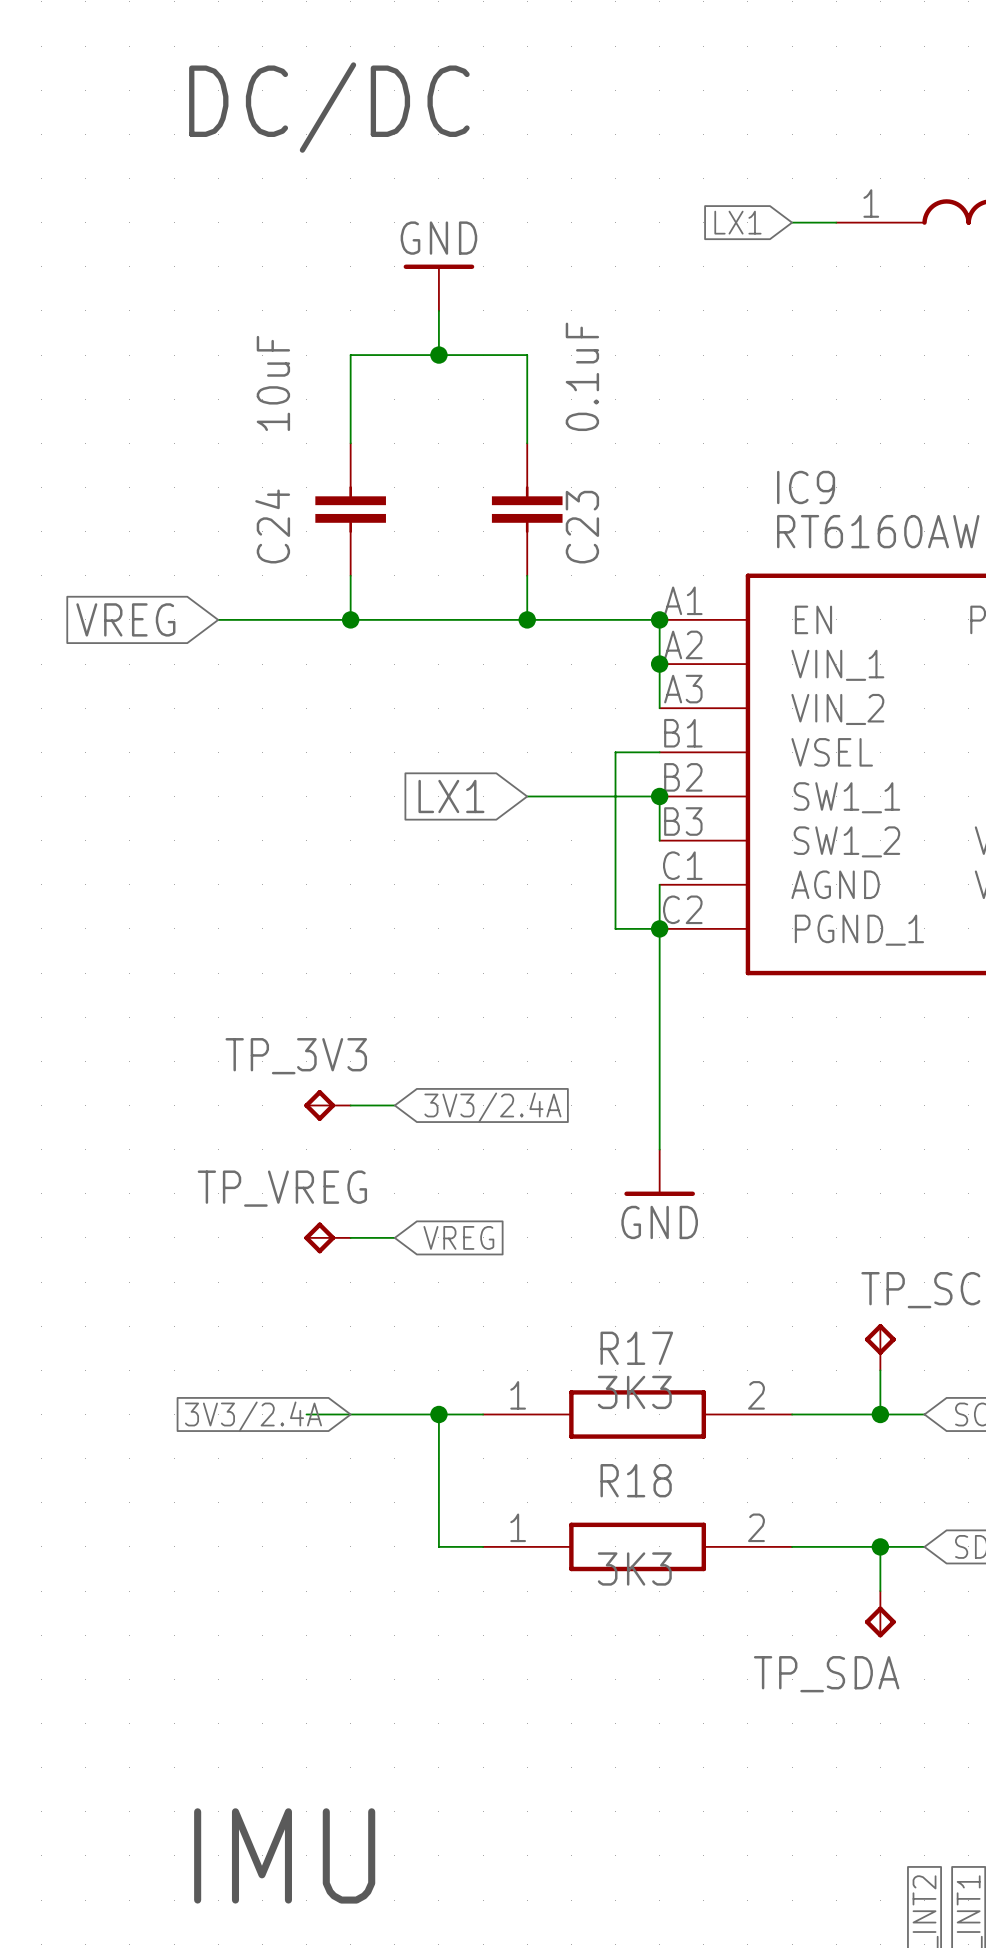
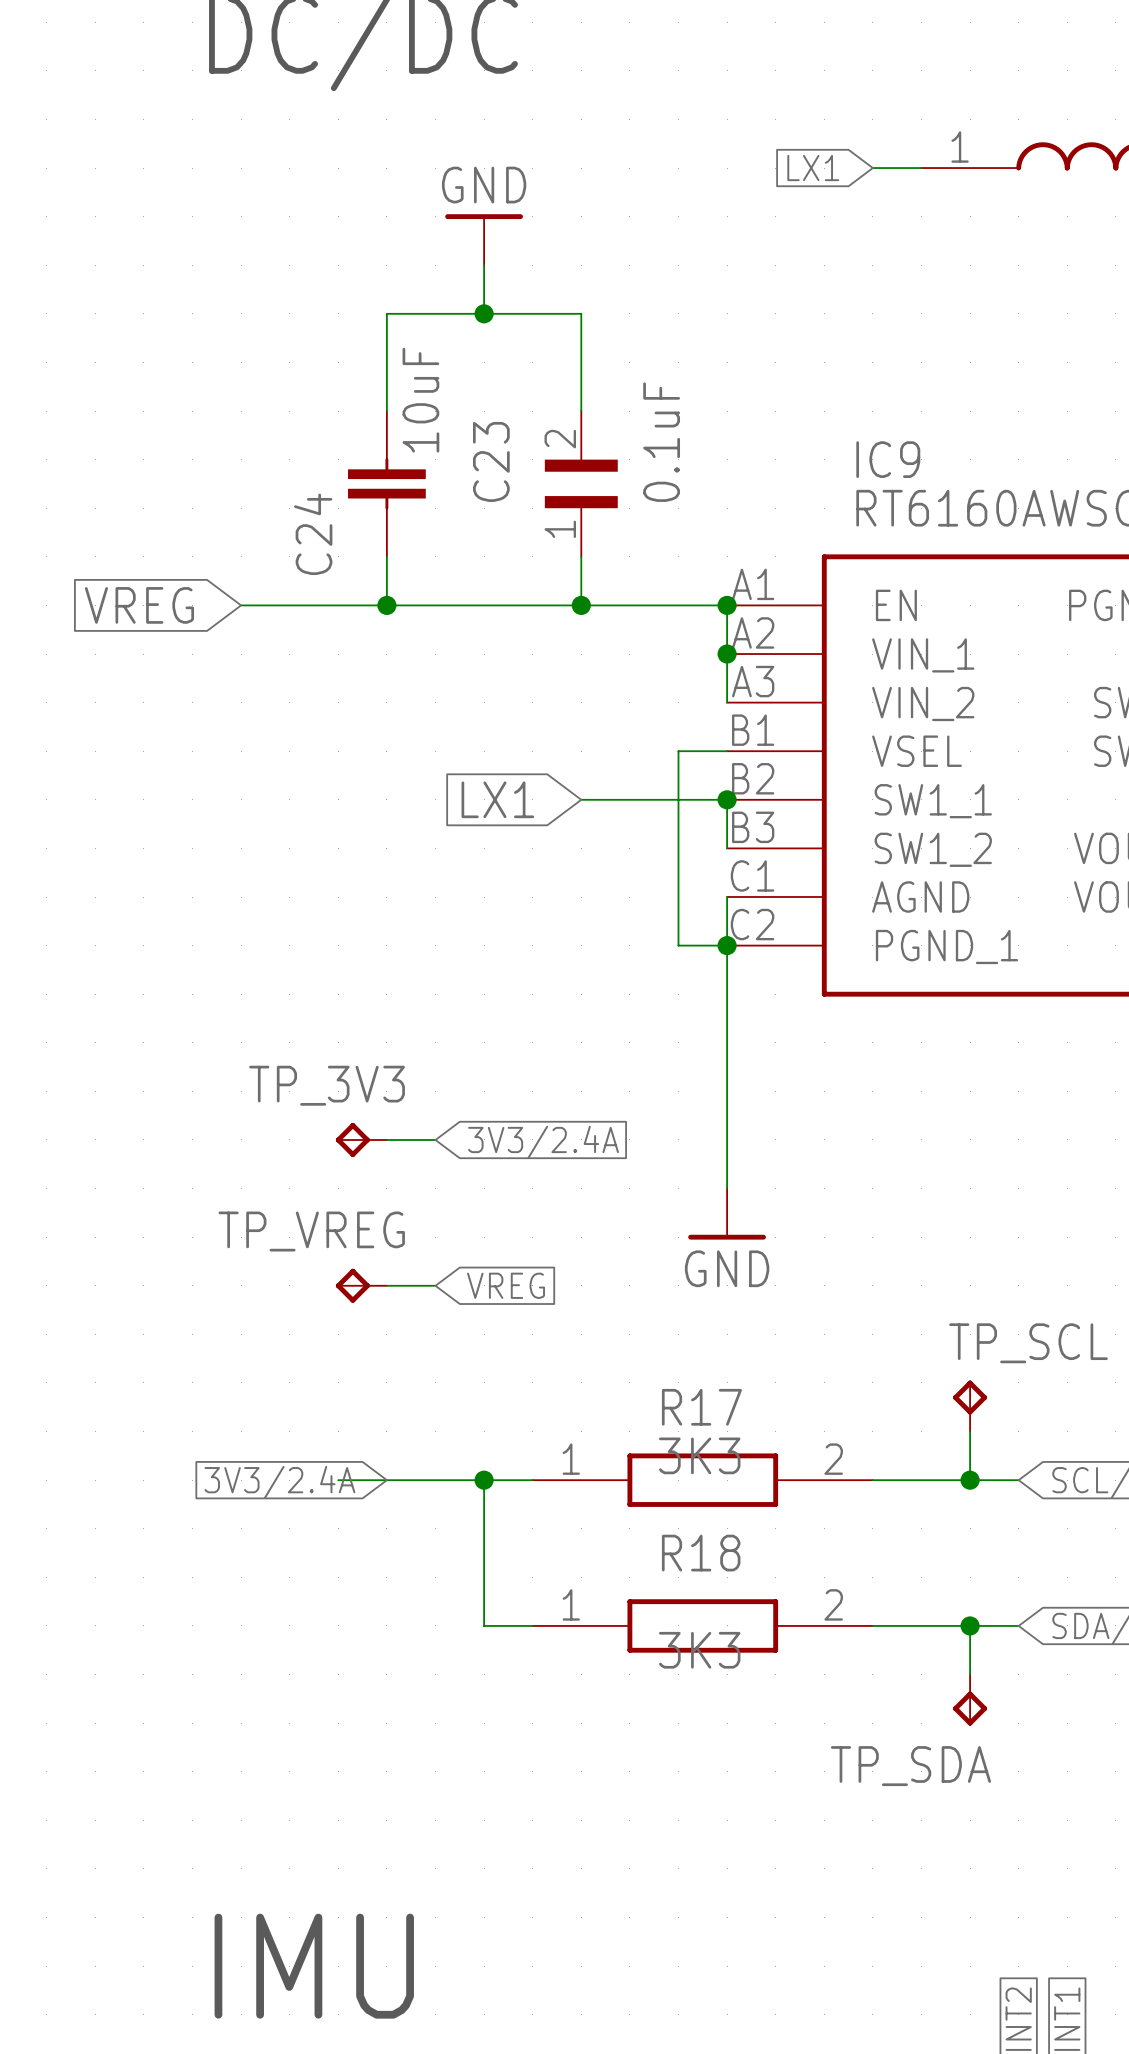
C23 value position: 0.1uF (582, 376) -> 0.1uF (661, 442)
C24 value position: 10uF (273, 383) -> 10uF (420, 400)
C23 symbol: [491, 443, 563, 576] -> [544, 411, 618, 557]
C24 name position: C24 (272, 526) -> C24 (313, 534)
C23 name position: C23 (582, 527) -> C23 (491, 461)

